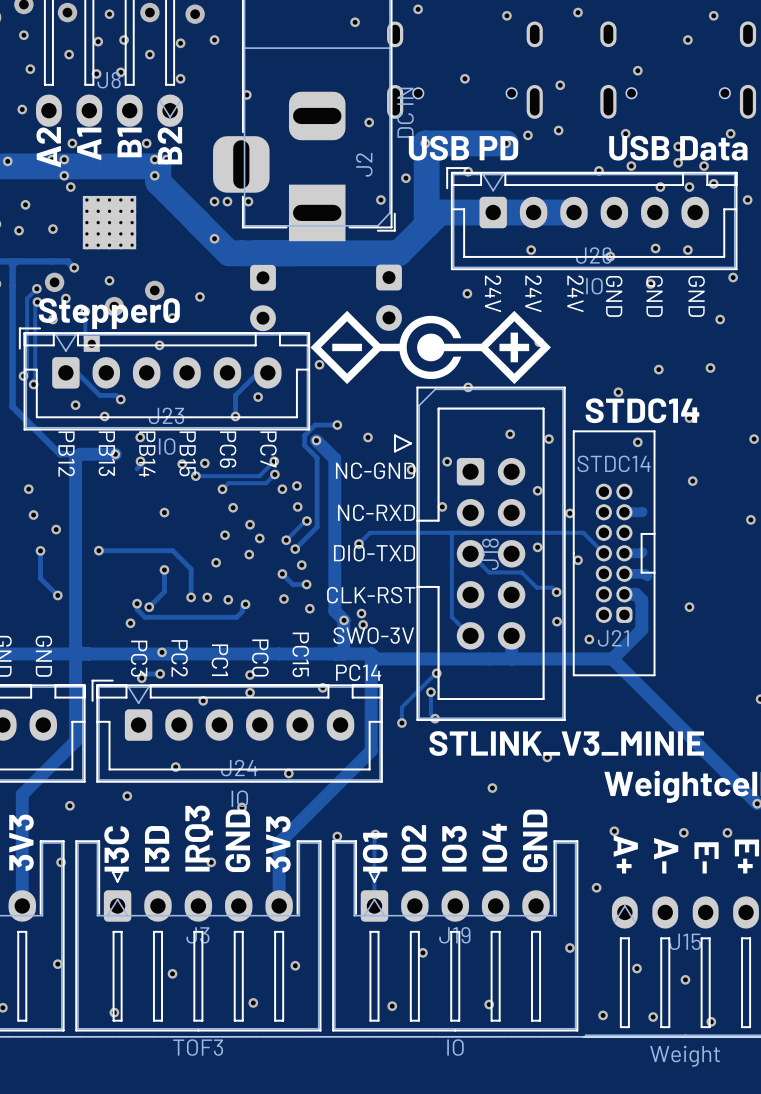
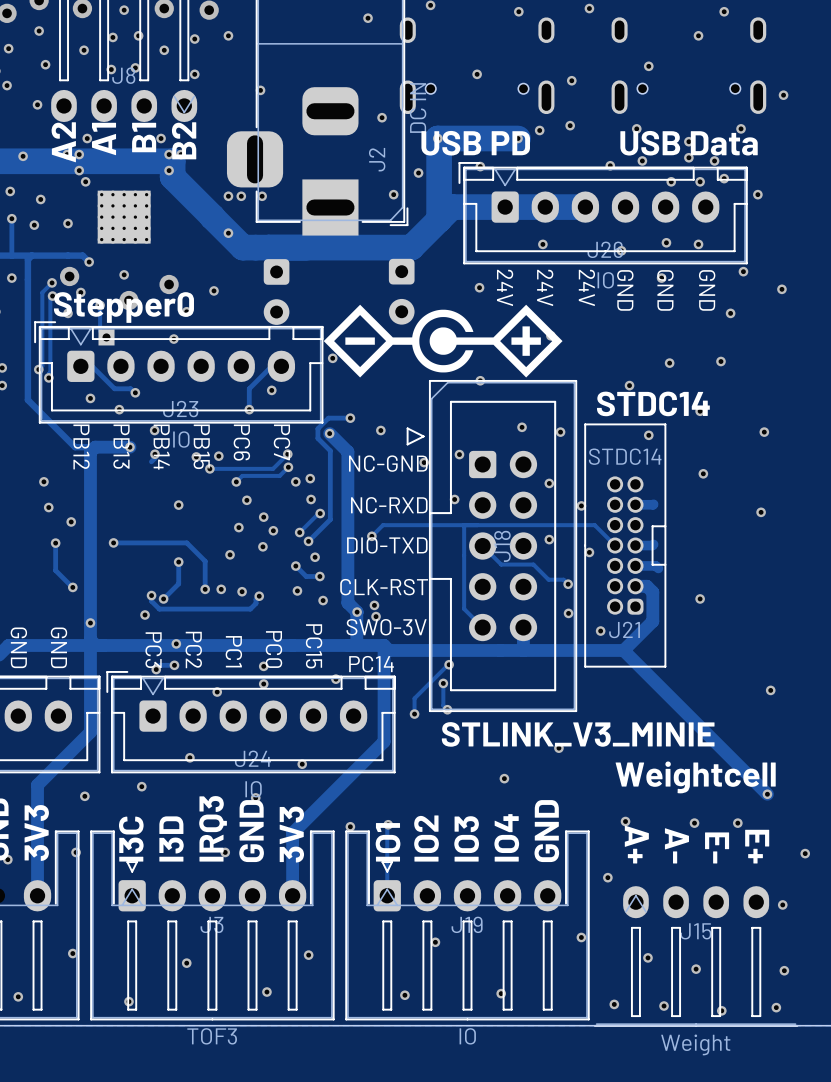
via: none -> (90, 623)

